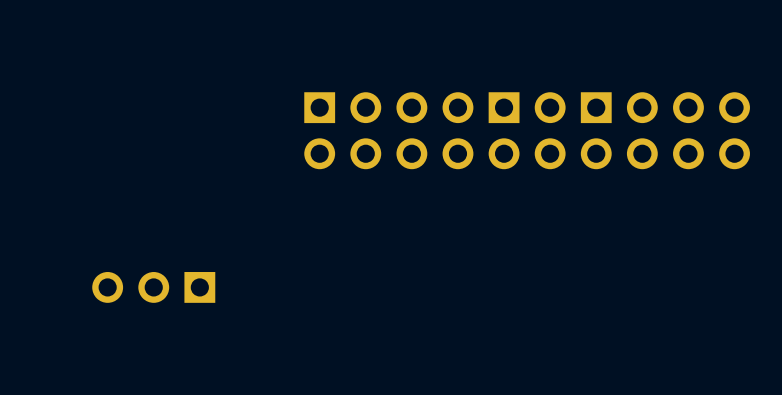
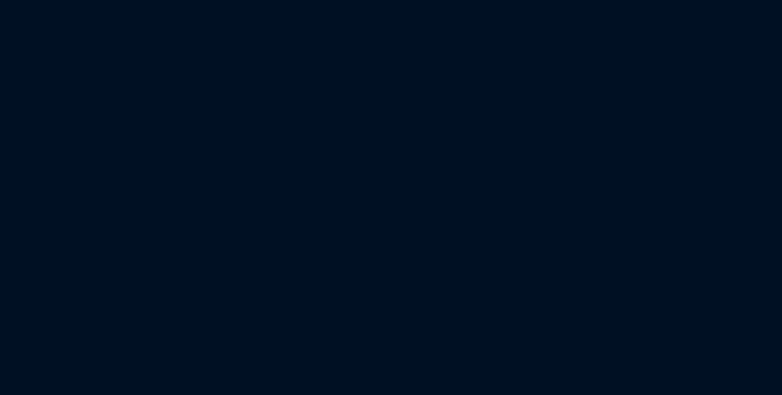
part: (388, 130) -> none
part: (527, 130) -> none
part: (665, 130) -> none
part: (153, 287) -> none

